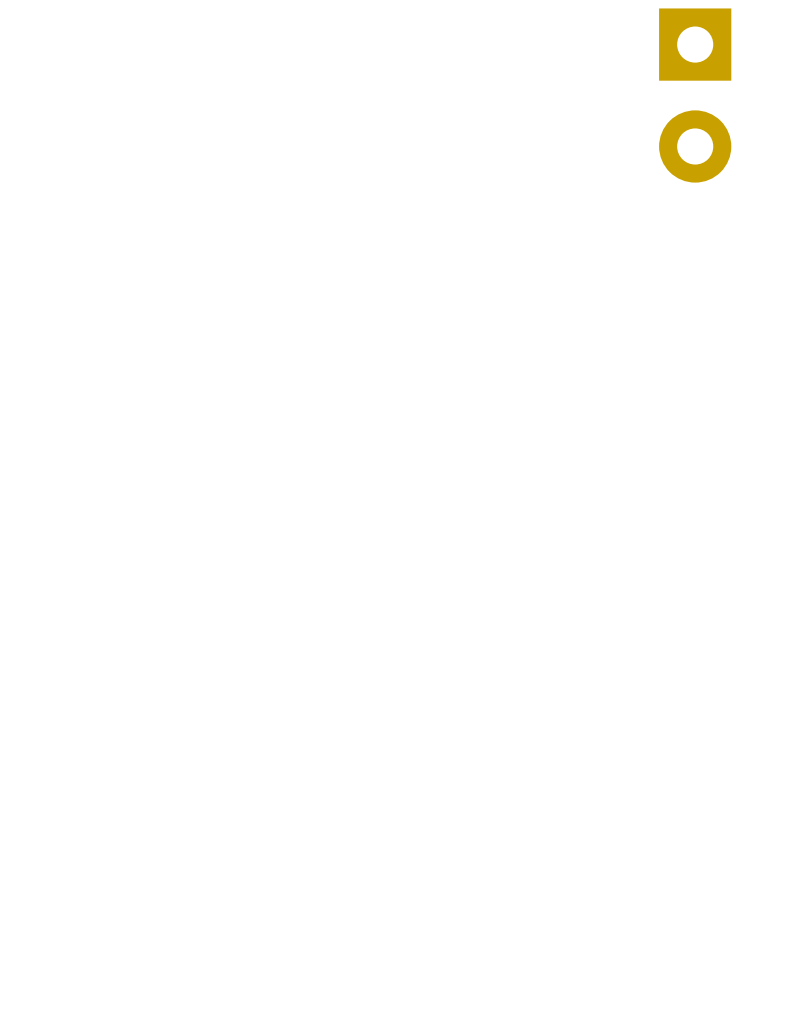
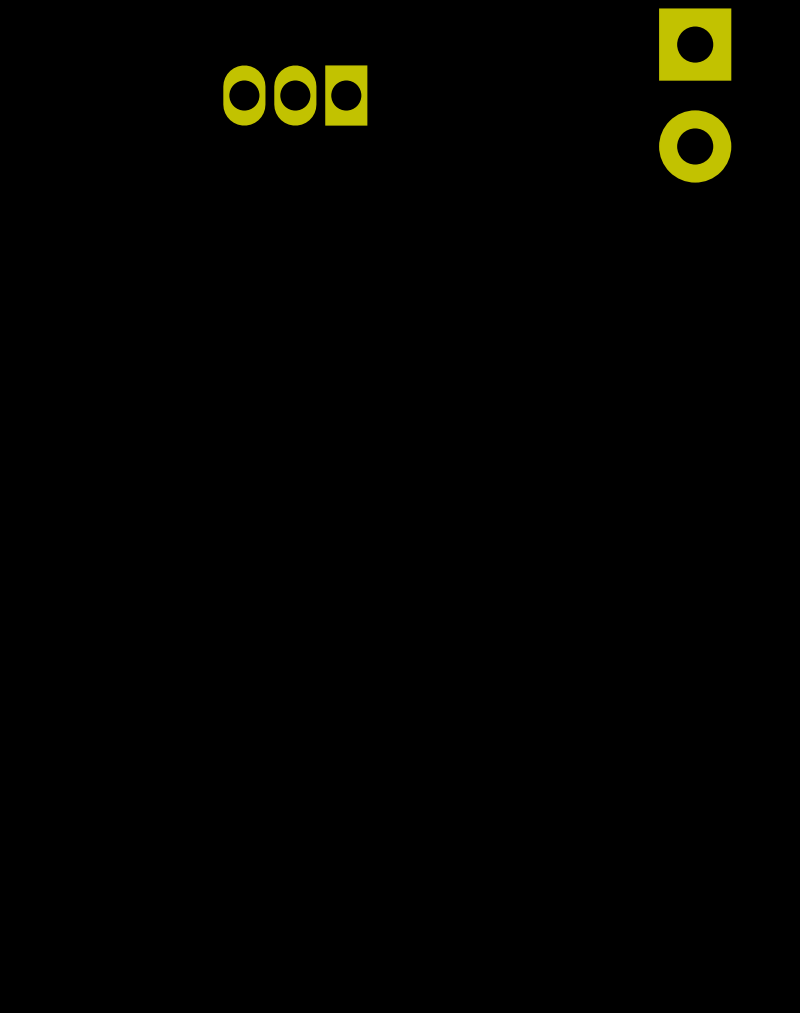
part: none -> (295, 95)

